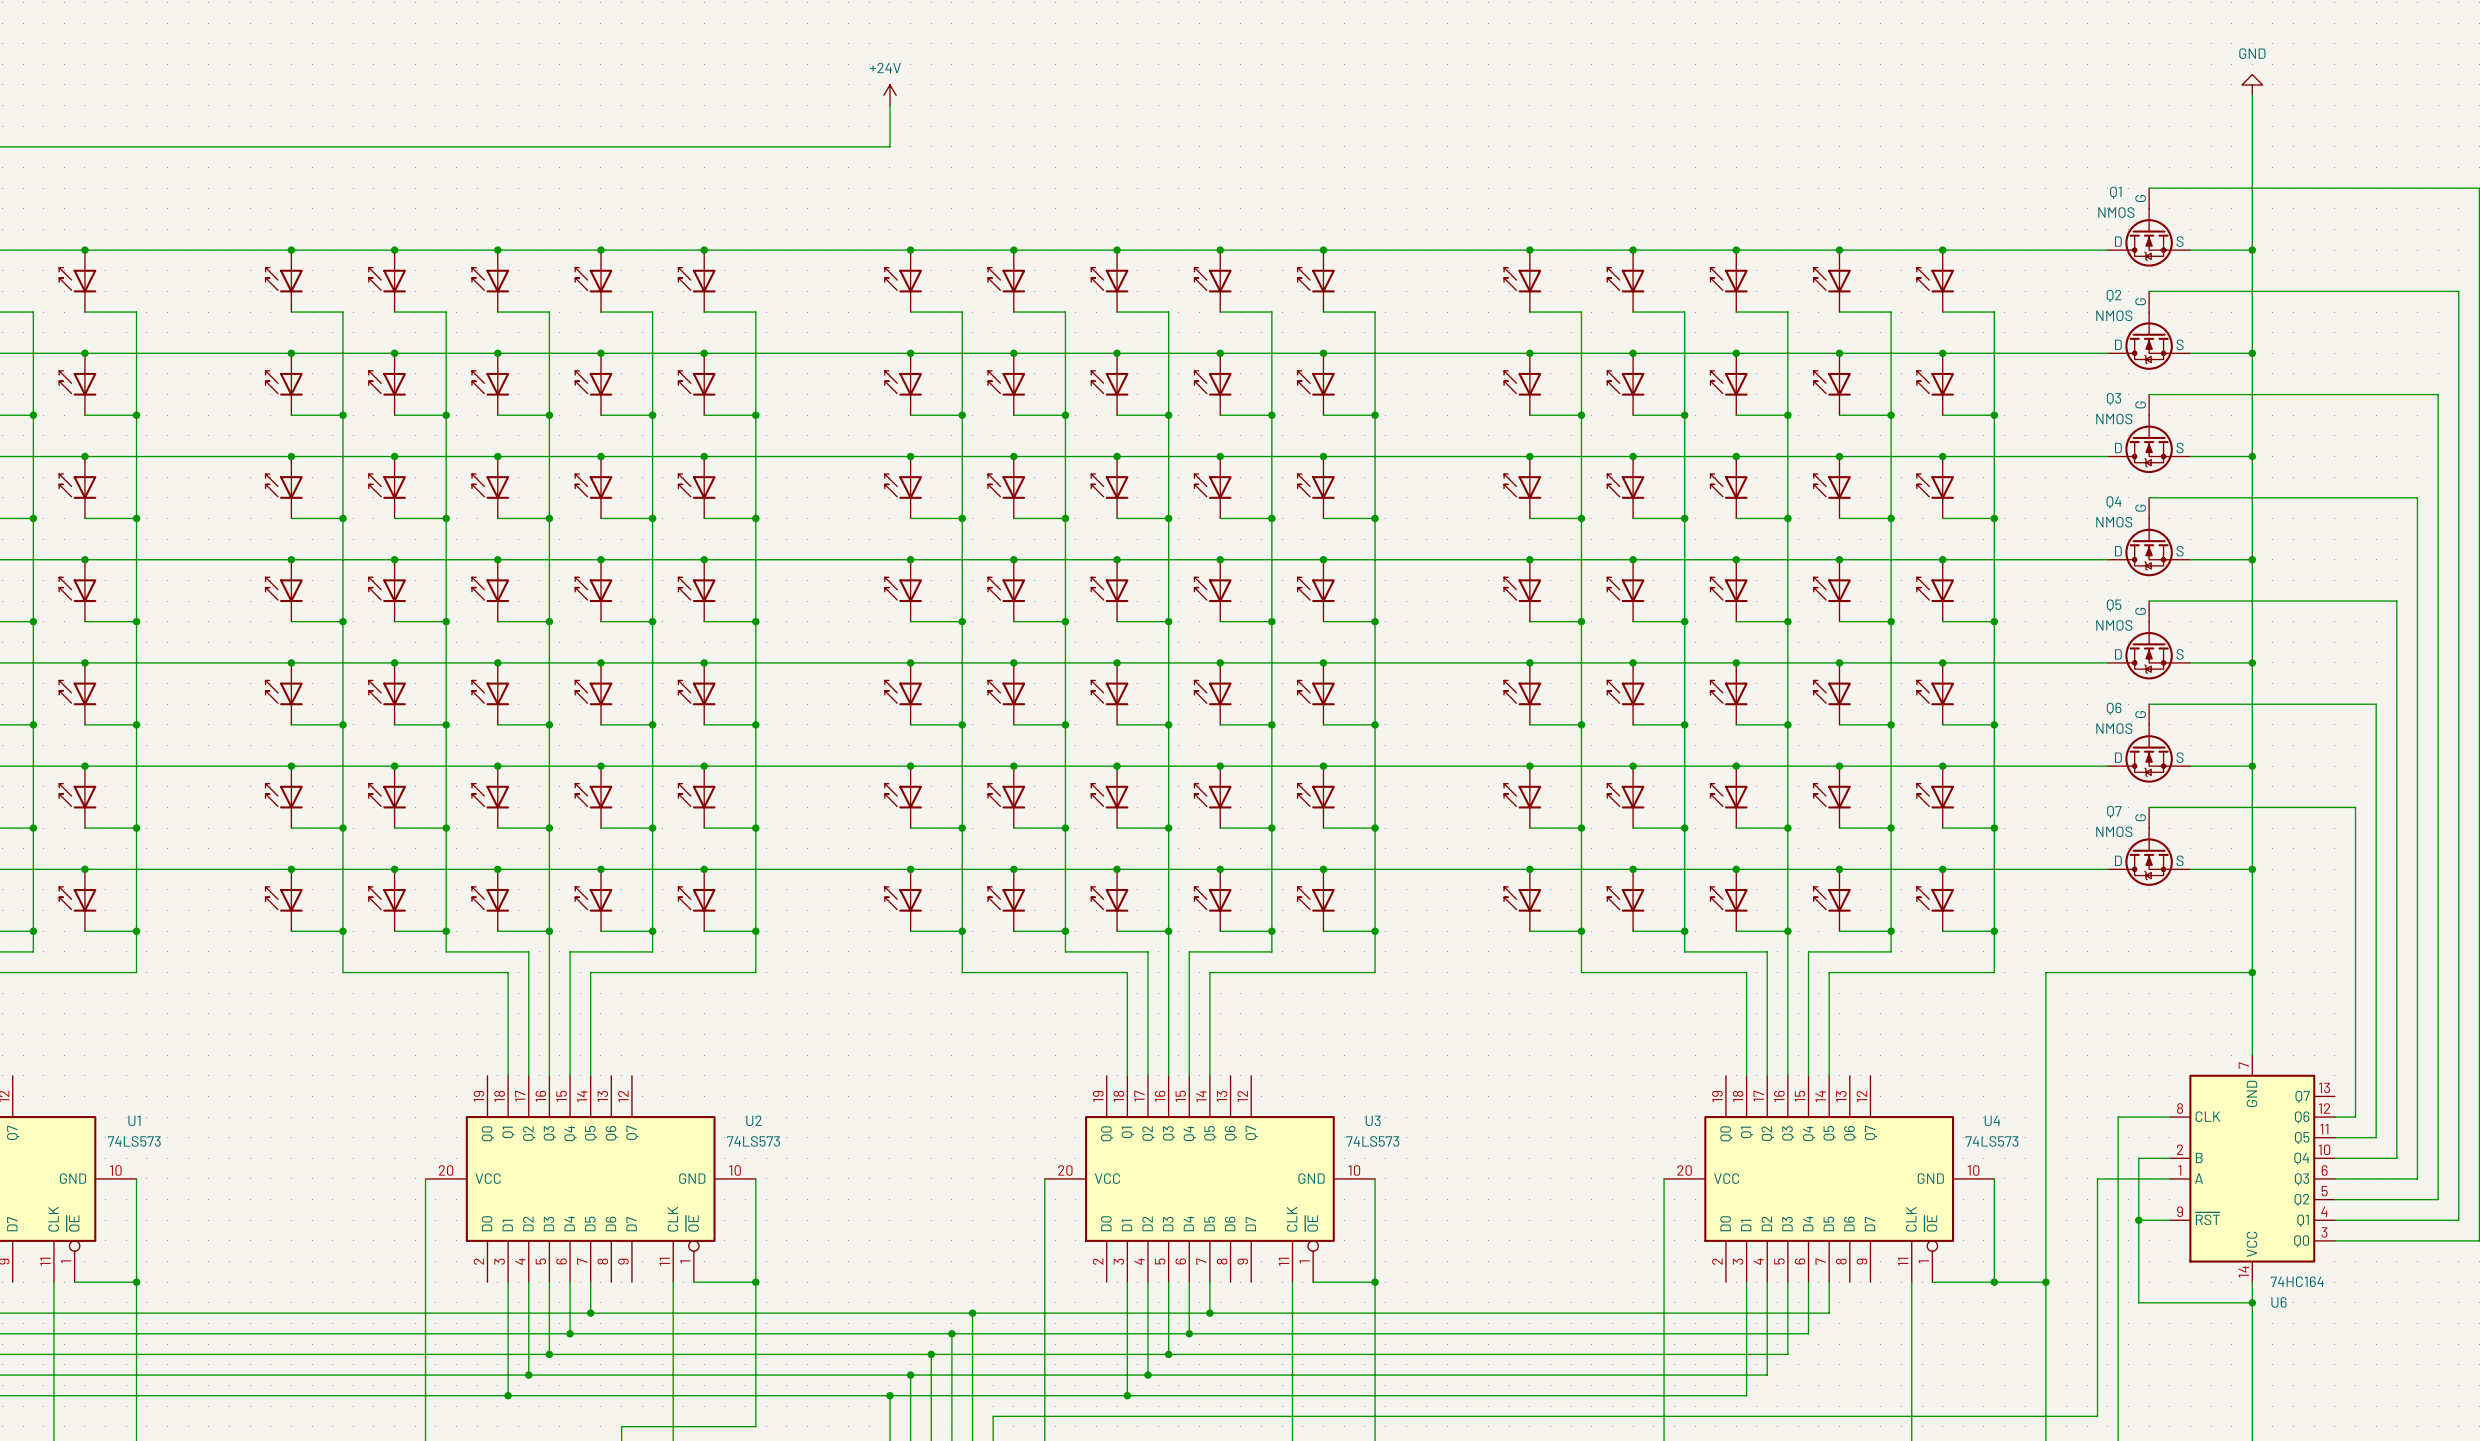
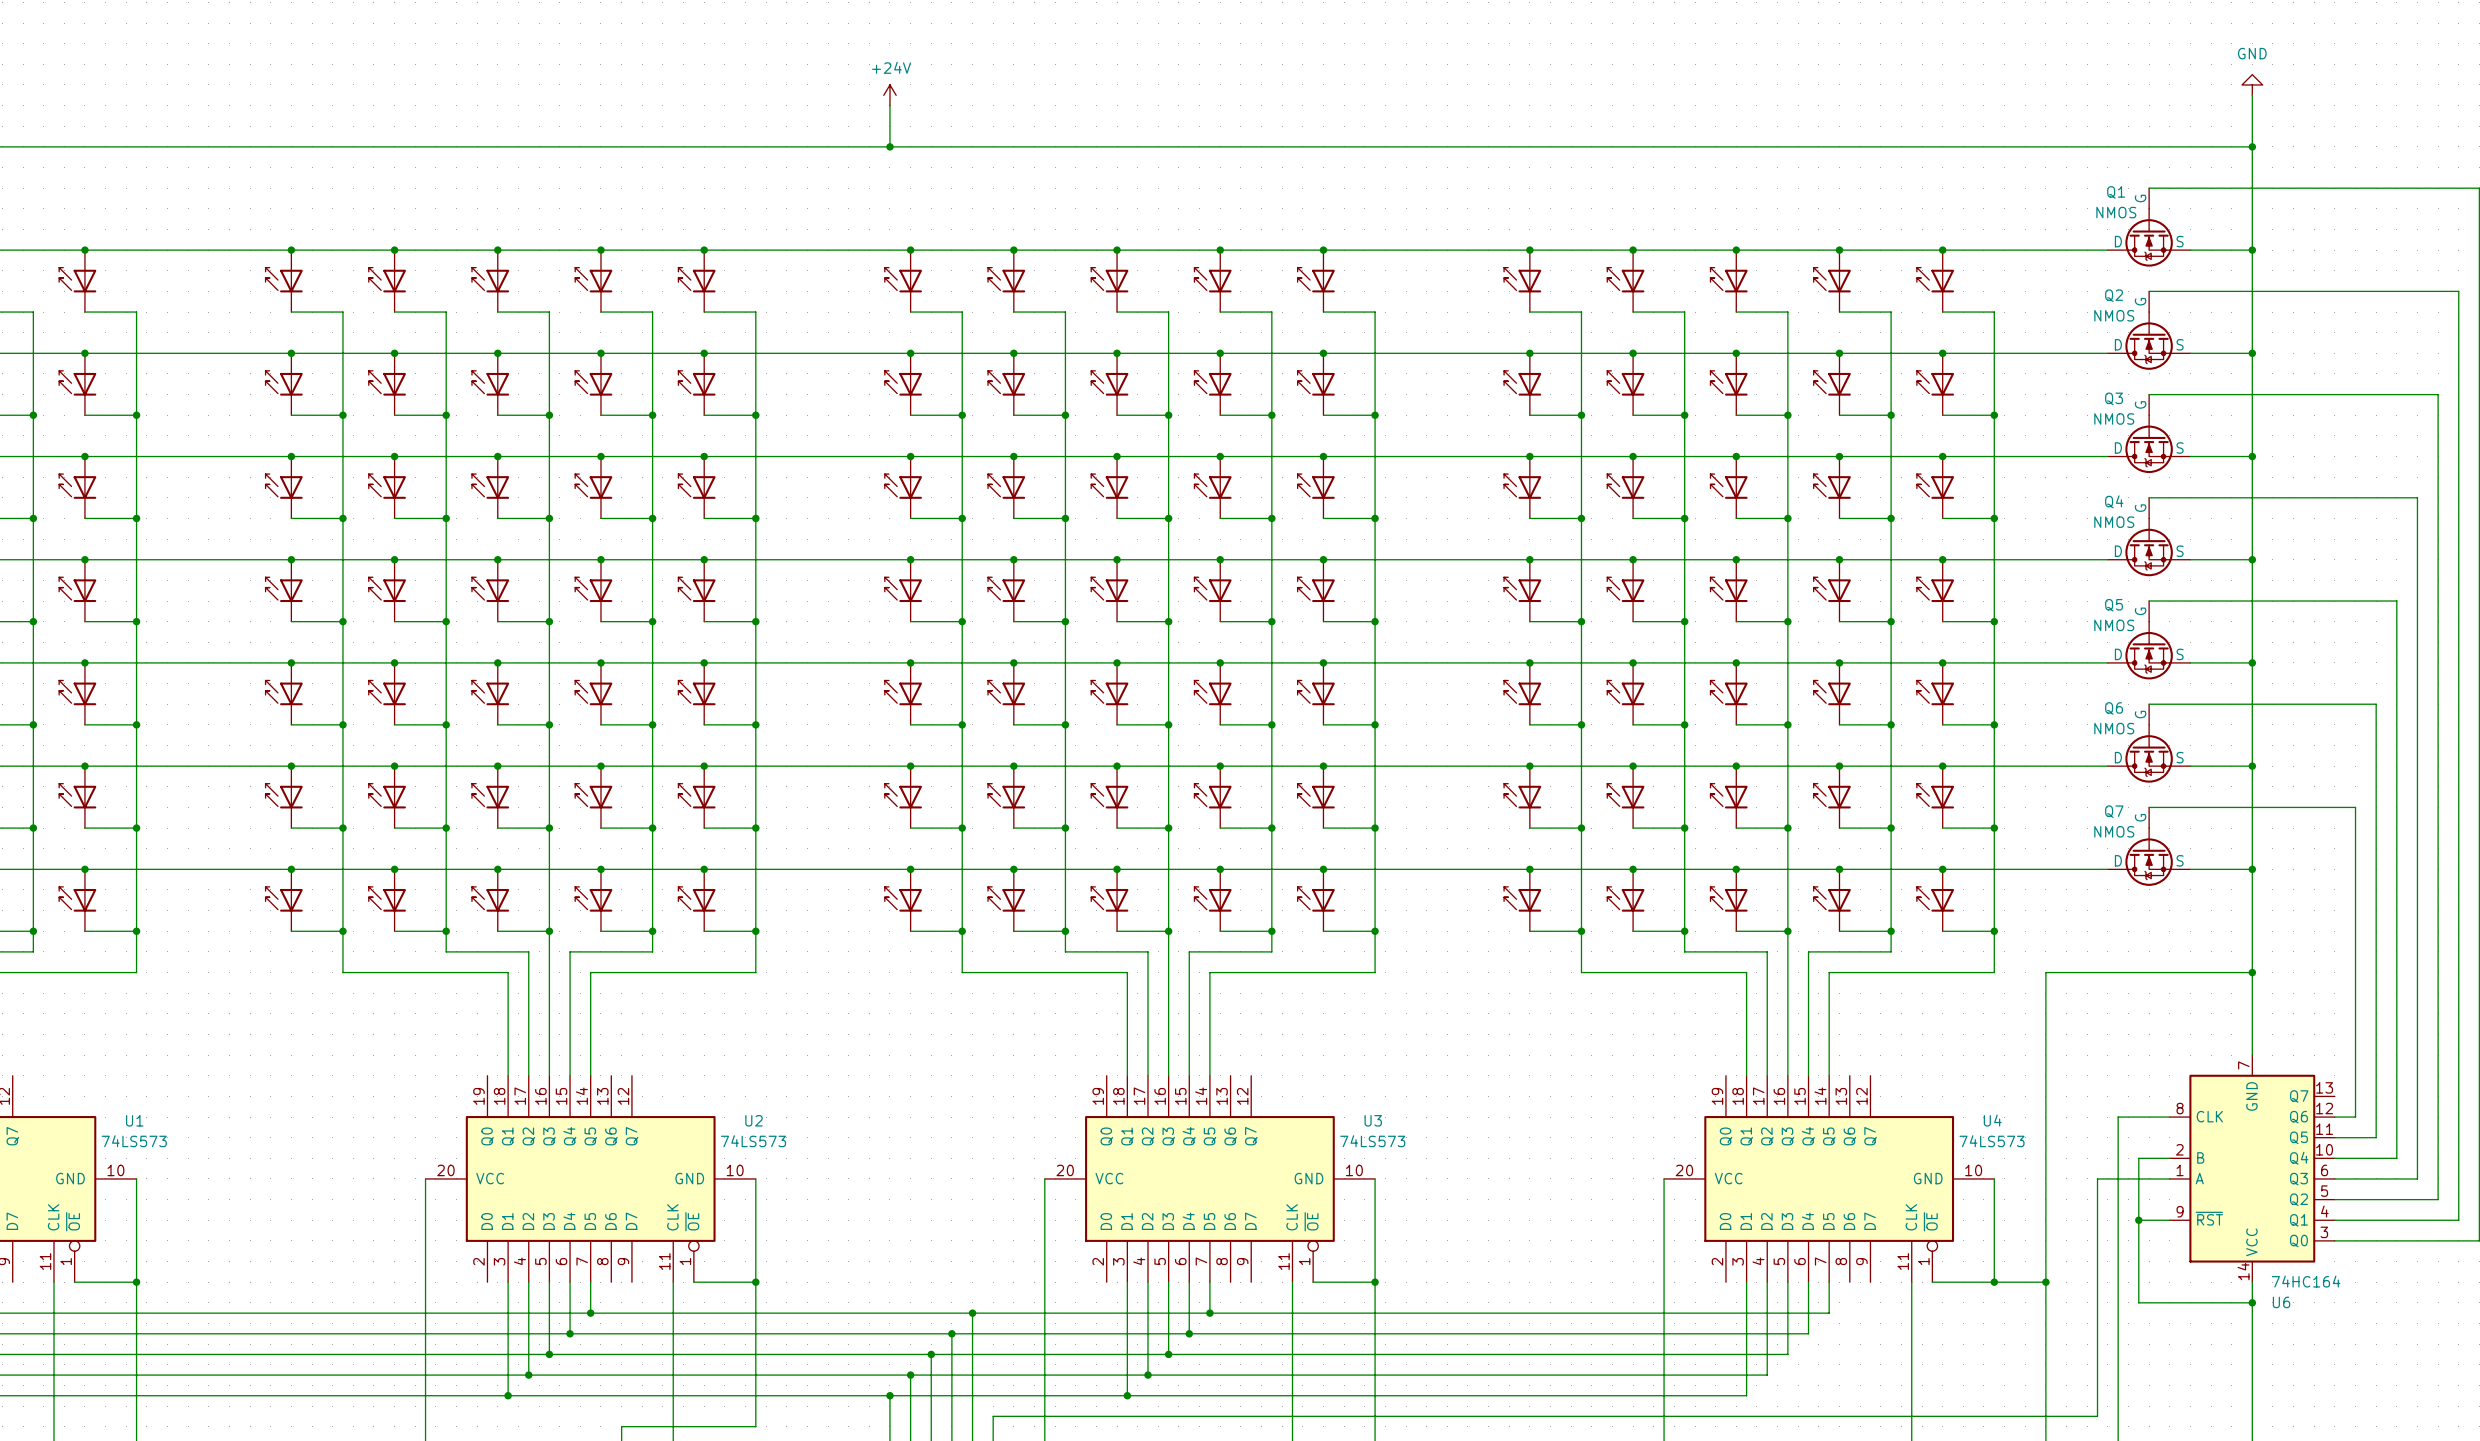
wire: none -> (889, 146) (2252, 146)
junction: none -> (889, 146)
junction: none -> (2252, 146)

